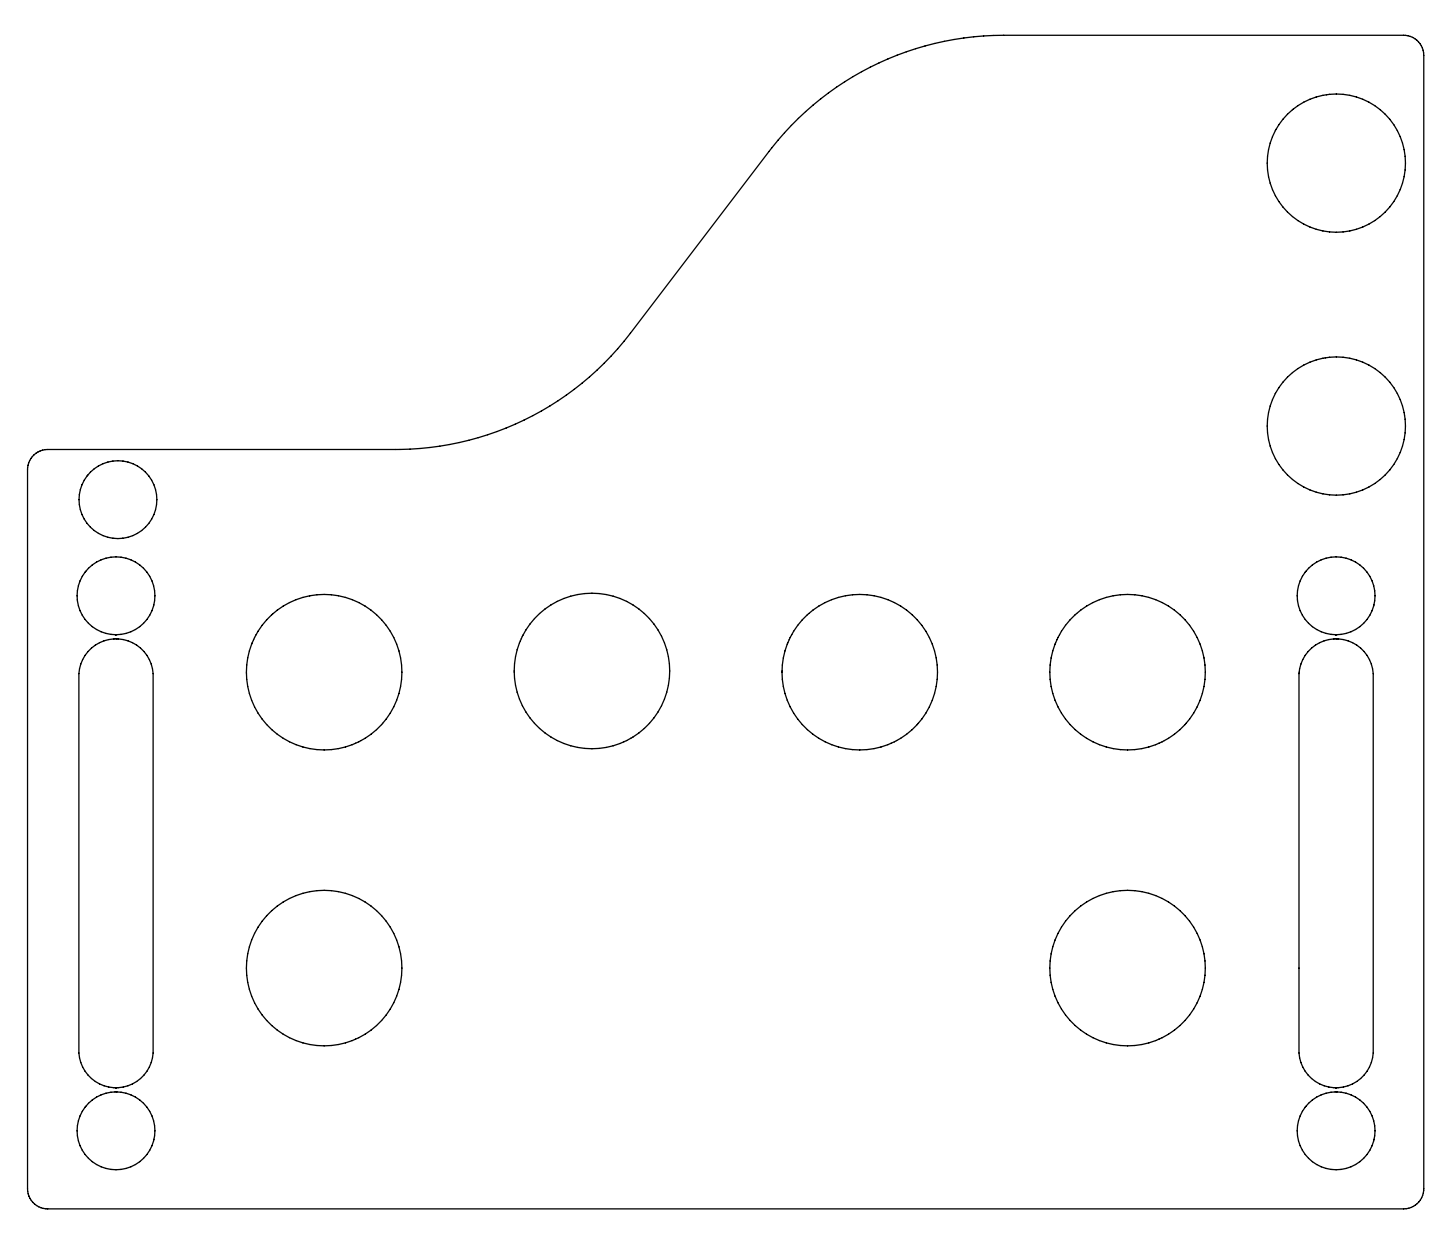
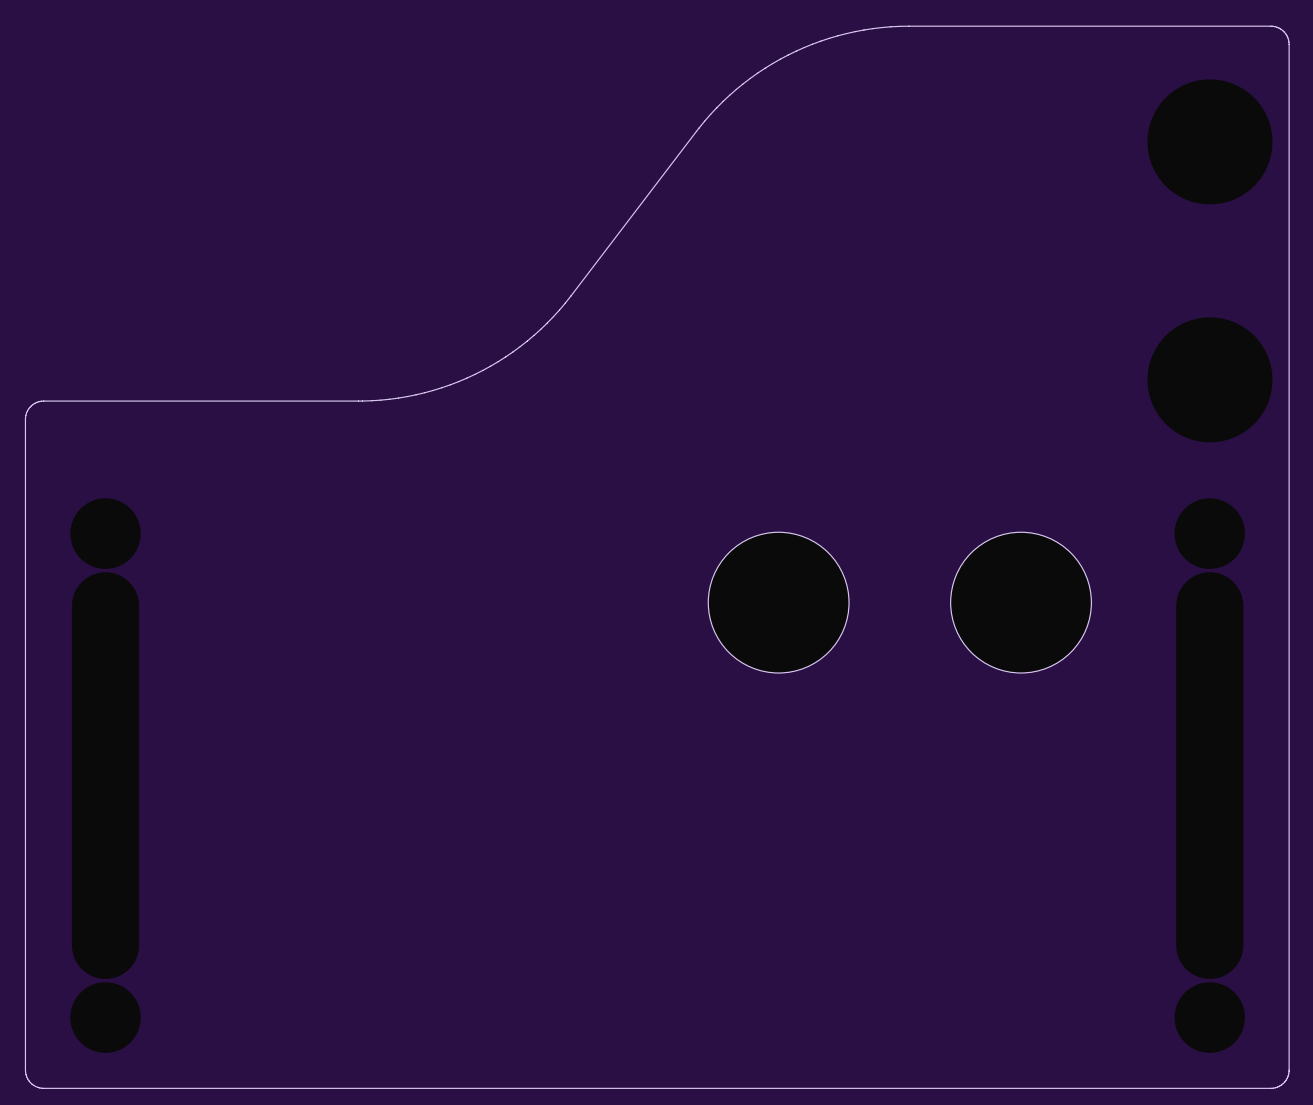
board edge: (1336, 94) (1309, 99) (1287, 114) (1272, 136) (1267, 163) (1272, 189) (1287, 212) (1309, 226) (1336, 232) (1362, 226) (1385, 212) (1400, 189) (1405, 163) (1400, 136) (1385, 114) (1362, 99) (1336, 94) -> none
part: none -> (1209, 141)
board edge: (1275, 393) (1267, 419) (1270, 446) (1282, 469) (1303, 487) (1329, 494) (1356, 492) (1380, 479) (1397, 458) (1405, 432) (1402, 405) (1389, 382) (1368, 365) (1343, 357) (1316, 359) (1292, 372) (1275, 393) -> none
part: none -> (1209, 379)
board edge: (117, 460) (103, 463) (90, 472) (81, 484) (79, 499) (81, 514) (90, 527) (103, 535) (117, 538) (132, 535) (145, 527) (153, 514) (156, 499) (153, 484) (145, 472) (132, 463) (117, 460) -> none
board edge: (116, 556) (101, 559) (88, 568) (80, 580) (77, 595) (80, 610) (88, 623) (101, 631) (115, 635) (130, 631) (143, 623) (151, 610) (154, 595) (151, 580) (143, 568) (130, 559) (116, 556) -> none
board edge: (1336, 556) (1321, 559) (1308, 568) (1300, 580) (1297, 595) (1300, 610) (1308, 623) (1321, 631) (1336, 635) (1351, 631) (1363, 623) (1372, 610) (1375, 595) (1372, 580) (1363, 568) (1351, 559) (1336, 556) -> none
board edge: (591, 593) (563, 598) (539, 613) (525, 630) (519, 642) (514, 670) (519, 699) (534, 723) (545, 733) (563, 743) (591, 748) (606, 747) (623, 741) (638, 733) (649, 723) (664, 699) (669, 670) (664, 642) (649, 618) (638, 608) (620, 598) (591, 593) -> none
board edge: (324, 594) (296, 599) (271, 614) (262, 625) (252, 642) (246, 672) (251, 700) (266, 724) (277, 734) (296, 744) (324, 749) (338, 748) (355, 743) (371, 734) (381, 724) (396, 700) (401, 672) (396, 644) (381, 619) (371, 610) (352, 599) (324, 594) -> none
board edge: (859, 594) (831, 599) (818, 606) (802, 619) (787, 644) (782, 672) (787, 700) (802, 724) (818, 738) (831, 744) (859, 749) (874, 748) (891, 743) (906, 734) (917, 724) (932, 700) (937, 672) (932, 644) (917, 619) (900, 606) (887, 599) (859, 594) -> none
board edge: (1127, 594) (1099, 599) (1086, 606) (1070, 619) (1055, 644) (1049, 672) (1055, 700) (1070, 724) (1086, 738) (1099, 744) (1127, 749) (1141, 748) (1158, 743) (1174, 734) (1185, 724) (1200, 700) (1205, 672) (1200, 644) (1185, 619) (1168, 606) (1155, 599) (1127, 594) -> none
part: none -> (105, 533)
part: none -> (1209, 533)
board edge: (116, 638) (104, 640) (91, 648) (82, 659) (78, 673) (78, 1052) (82, 1067) (91, 1078) (104, 1085) (115, 1088) -> none
board edge: (116, 638) (127, 640) (140, 648) (149, 659) (153, 673) (153, 1052) (149, 1067) (140, 1078) (127, 1085) (115, 1088) -> none
board edge: (1336, 638) (1324, 640) (1311, 648) (1302, 659) (1298, 673) (1298, 1052) (1302, 1067) (1311, 1078) (1324, 1085) (1336, 1088) -> none
board edge: (1336, 638) (1348, 640) (1360, 648) (1369, 659) (1373, 673) (1373, 1052) (1369, 1067) (1360, 1078) (1348, 1085) (1336, 1088) -> none
part: none -> (778, 602)
part: none -> (1021, 602)
part: none -> (105, 775)
part: none -> (1209, 775)
board edge: (324, 890) (296, 895) (271, 910) (258, 927) (251, 940) (246, 968) (251, 996) (266, 1020) (277, 1030) (296, 1040) (324, 1045) (338, 1044) (355, 1039) (371, 1030) (381, 1020) (396, 996) (401, 968) (396, 940) (381, 915) (371, 906) (352, 895) (324, 890) -> none
board edge: (1127, 890) (1099, 895) (1086, 901) (1070, 915) (1055, 940) (1049, 968) (1055, 996) (1070, 1020) (1086, 1034) (1099, 1040) (1127, 1045) (1141, 1044) (1158, 1039) (1174, 1030) (1185, 1020) (1200, 996) (1205, 968) (1200, 940) (1185, 915) (1168, 901) (1155, 895) (1127, 890) -> none
board edge: (116, 1091) (101, 1094) (88, 1103) (80, 1115) (77, 1130) (80, 1145) (88, 1158) (101, 1166) (116, 1169) (130, 1166) (143, 1158) (151, 1145) (154, 1130) (151, 1115) (143, 1103) (130, 1094) (116, 1091) -> none
board edge: (1336, 1091) (1321, 1094) (1308, 1103) (1300, 1115) (1297, 1130) (1300, 1145) (1308, 1158) (1321, 1166) (1336, 1169) (1351, 1166) (1363, 1158) (1372, 1145) (1375, 1130) (1372, 1115) (1363, 1103) (1351, 1094) (1336, 1091) -> none
part: none -> (105, 1017)
part: none -> (1209, 1017)

